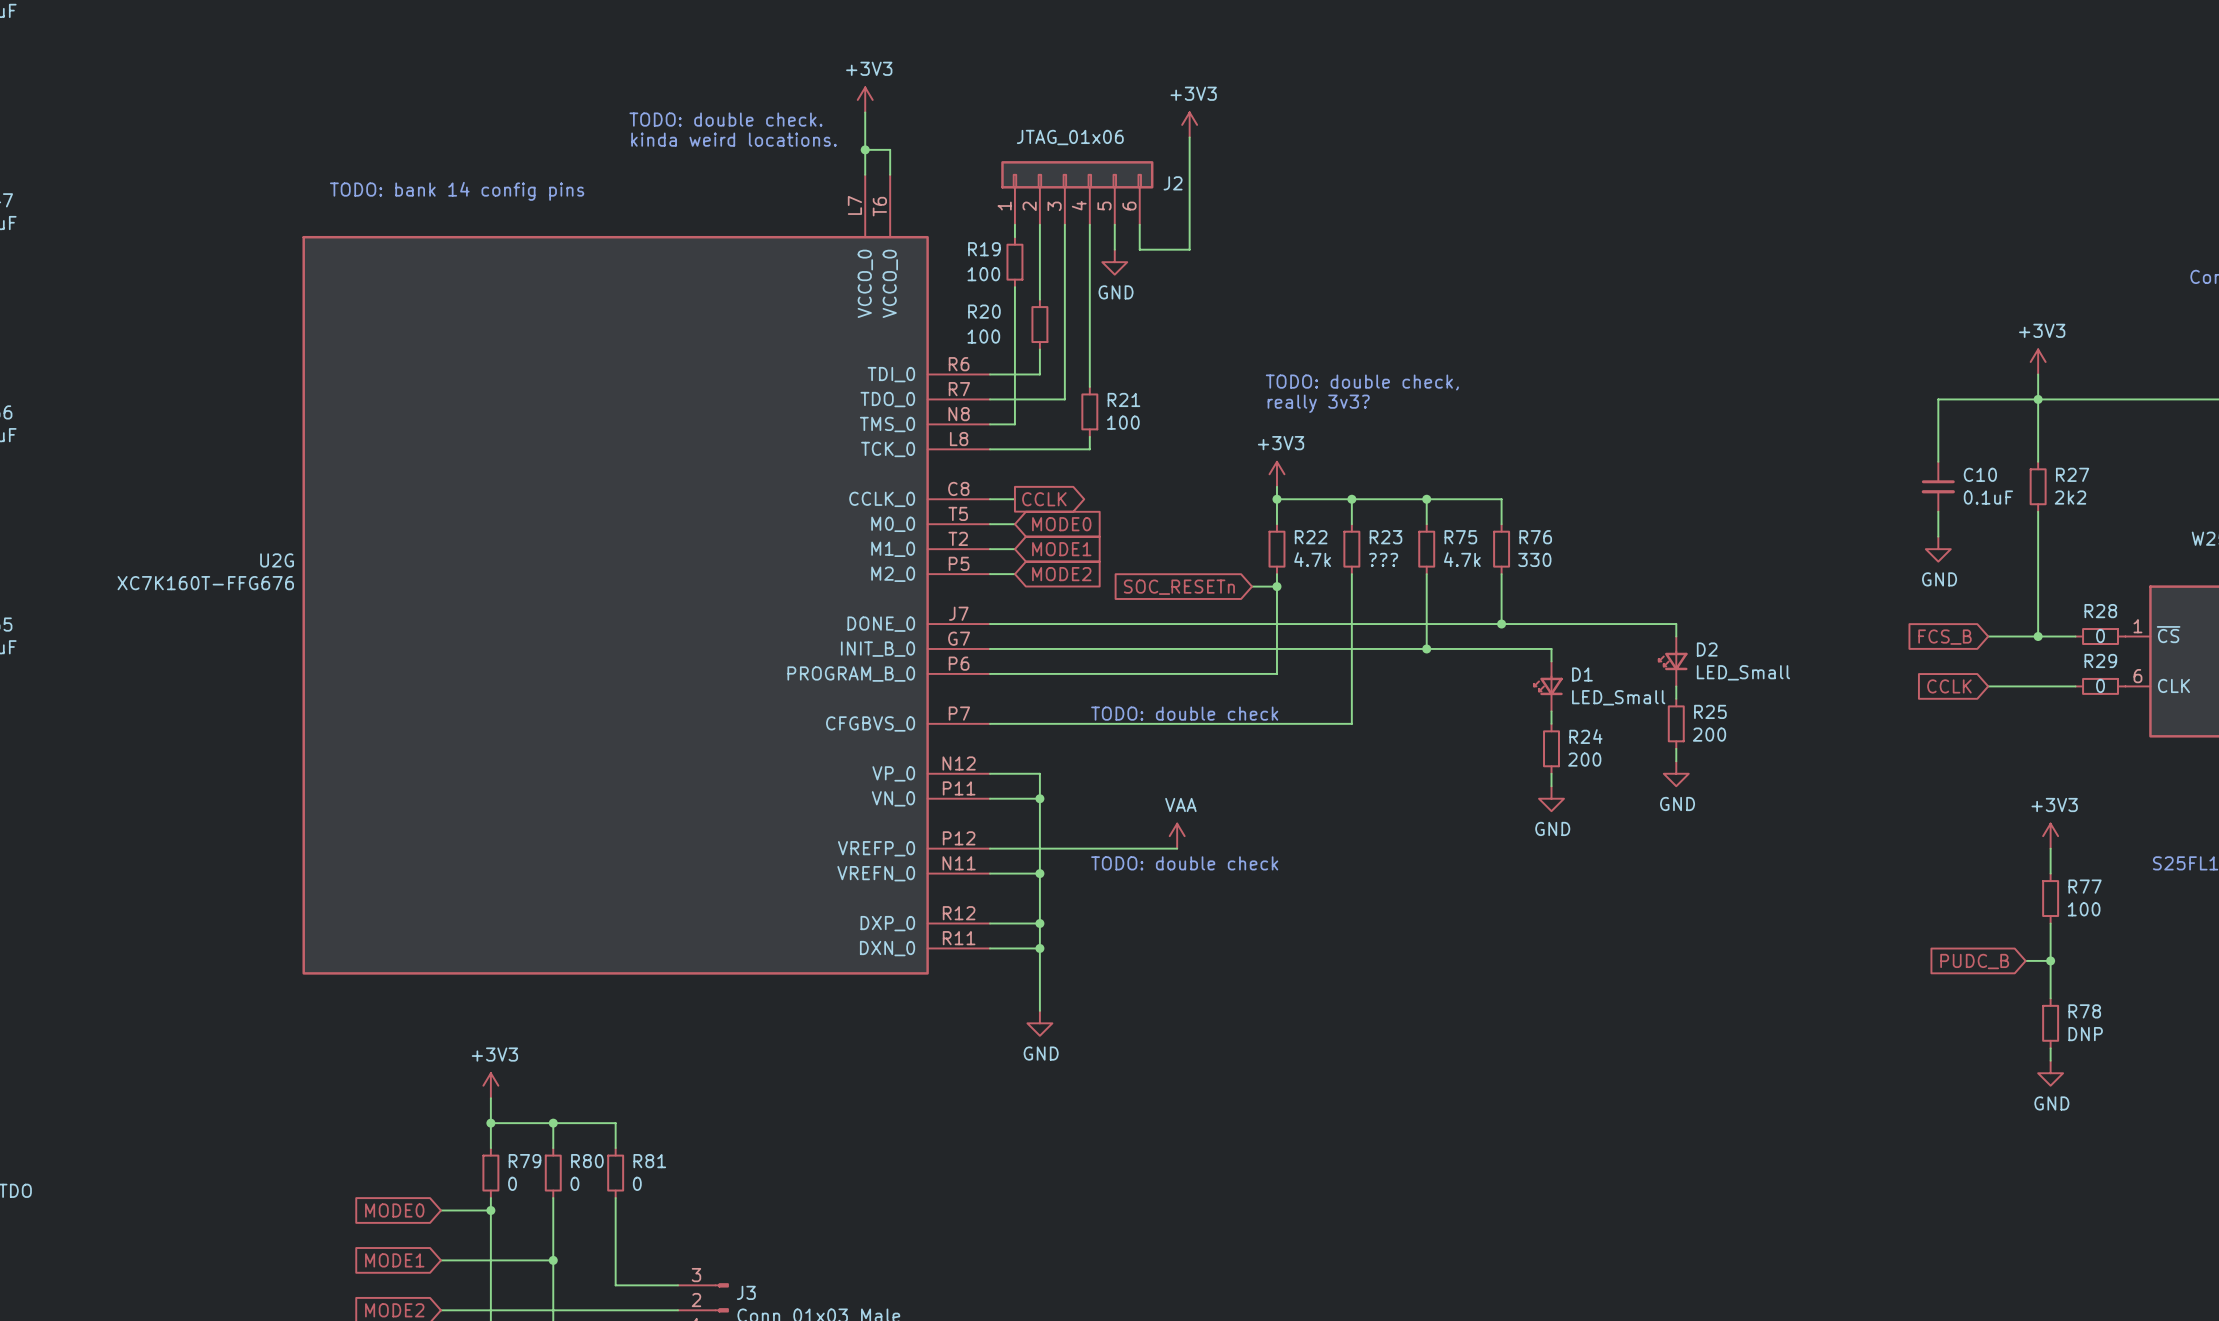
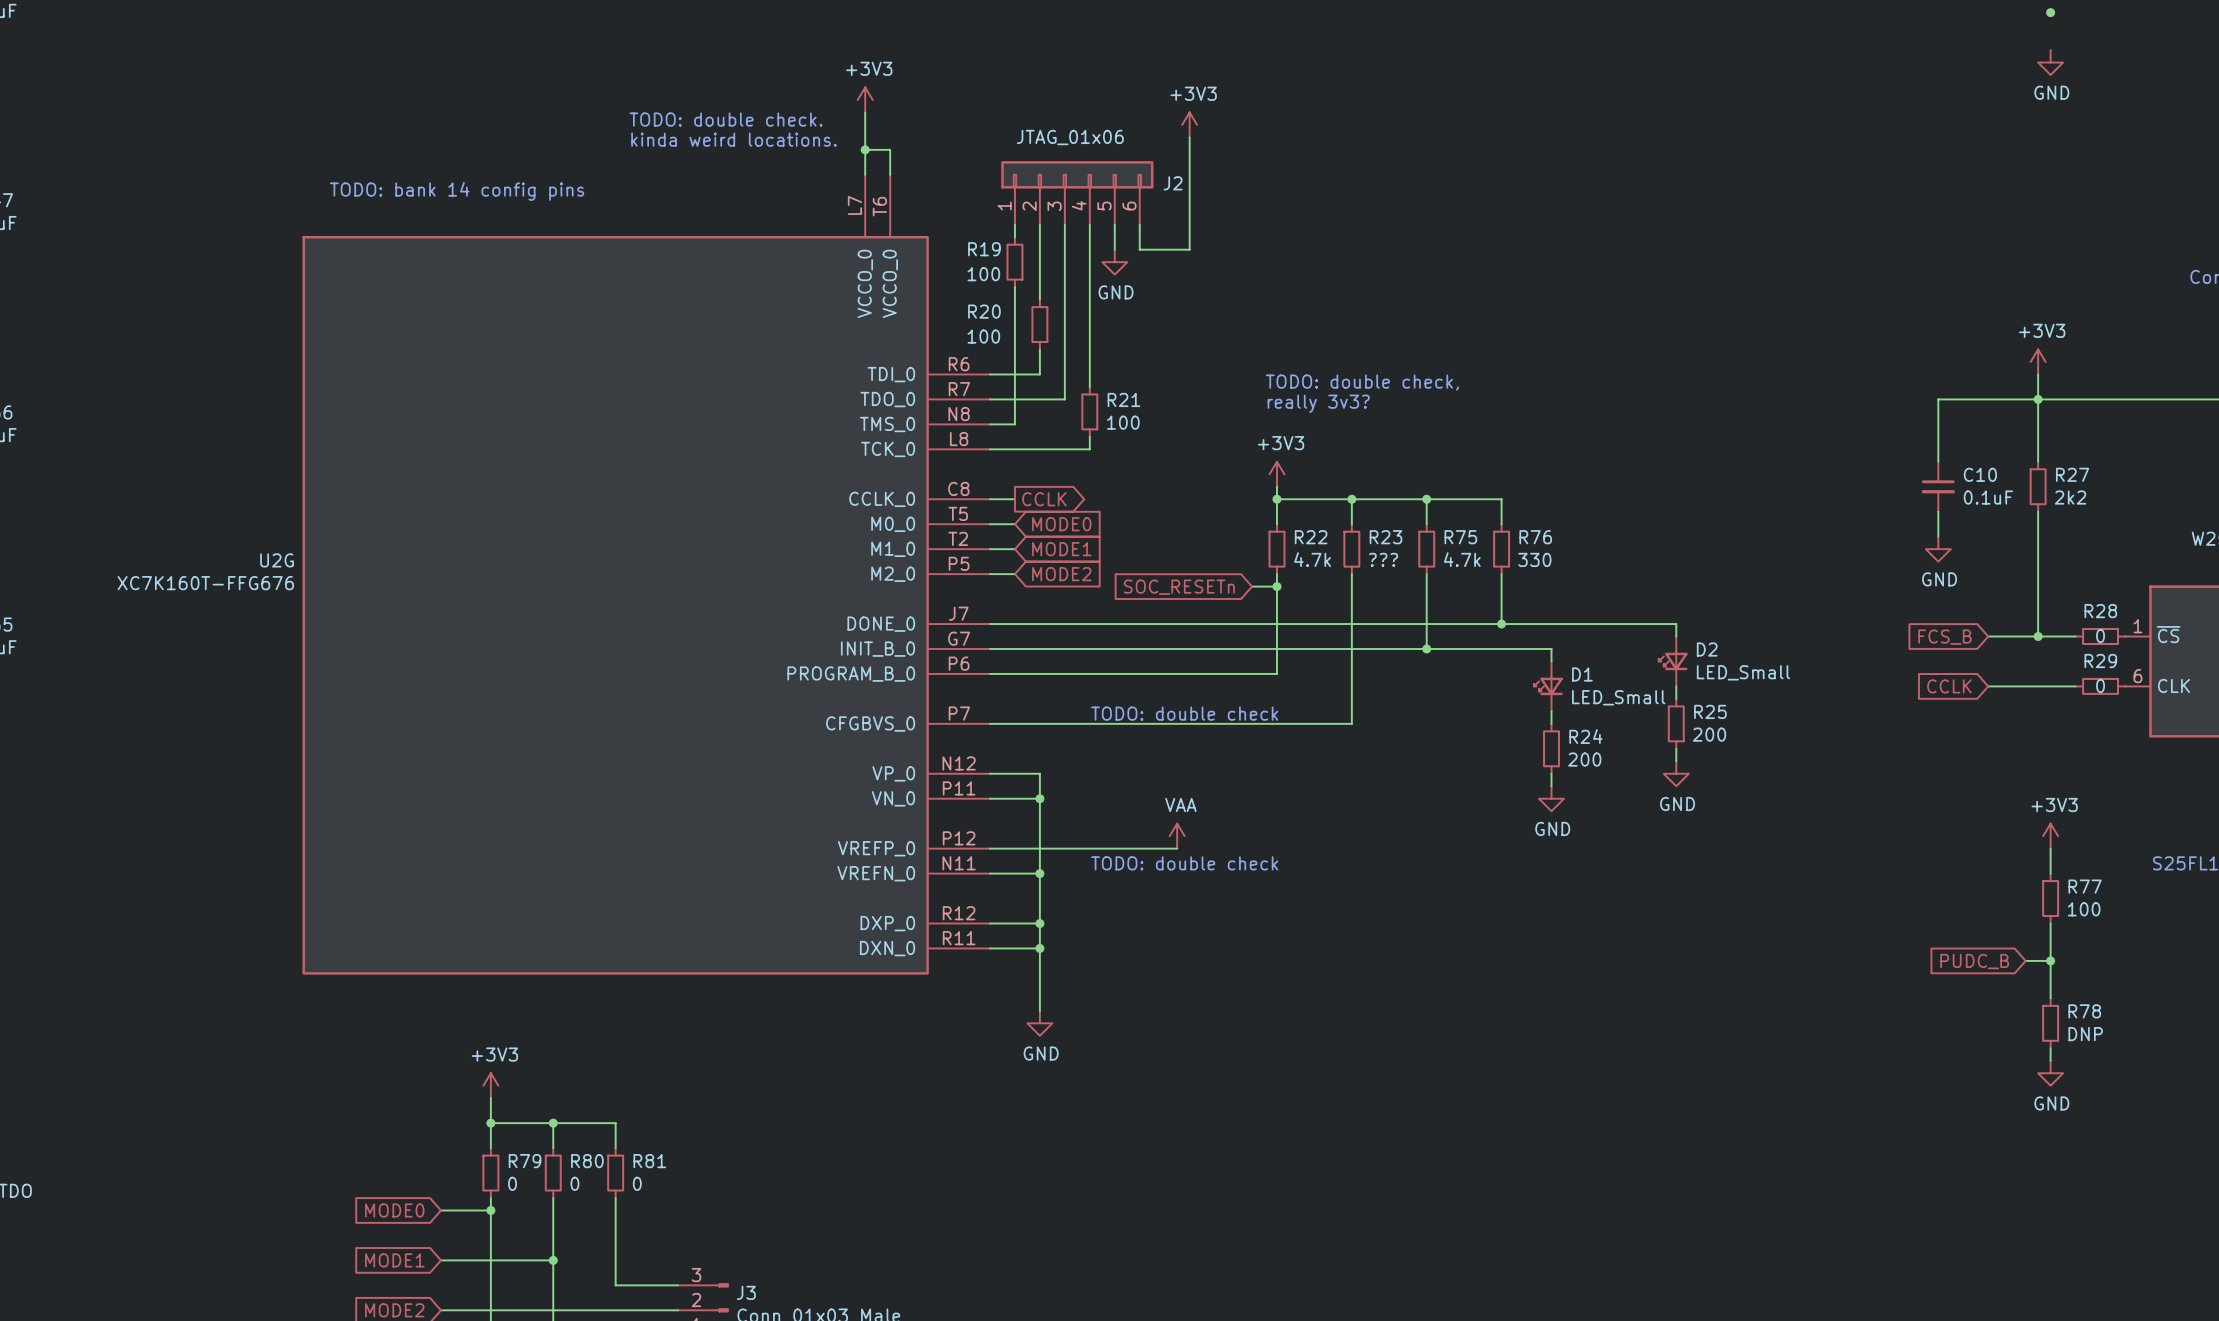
junction: none -> (2050, 12)
power symbol: none -> GND (2050, 62)

